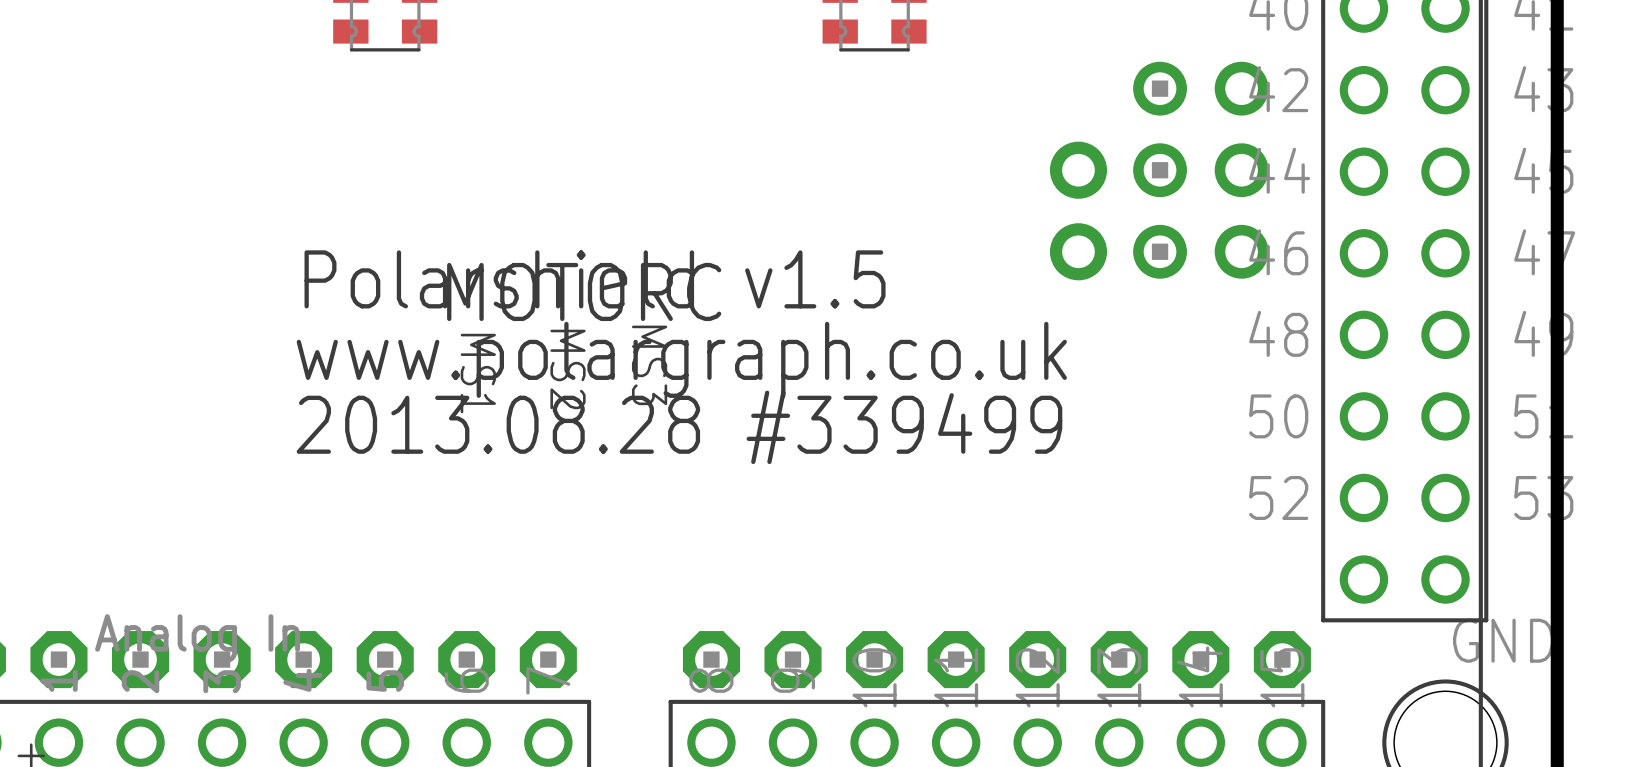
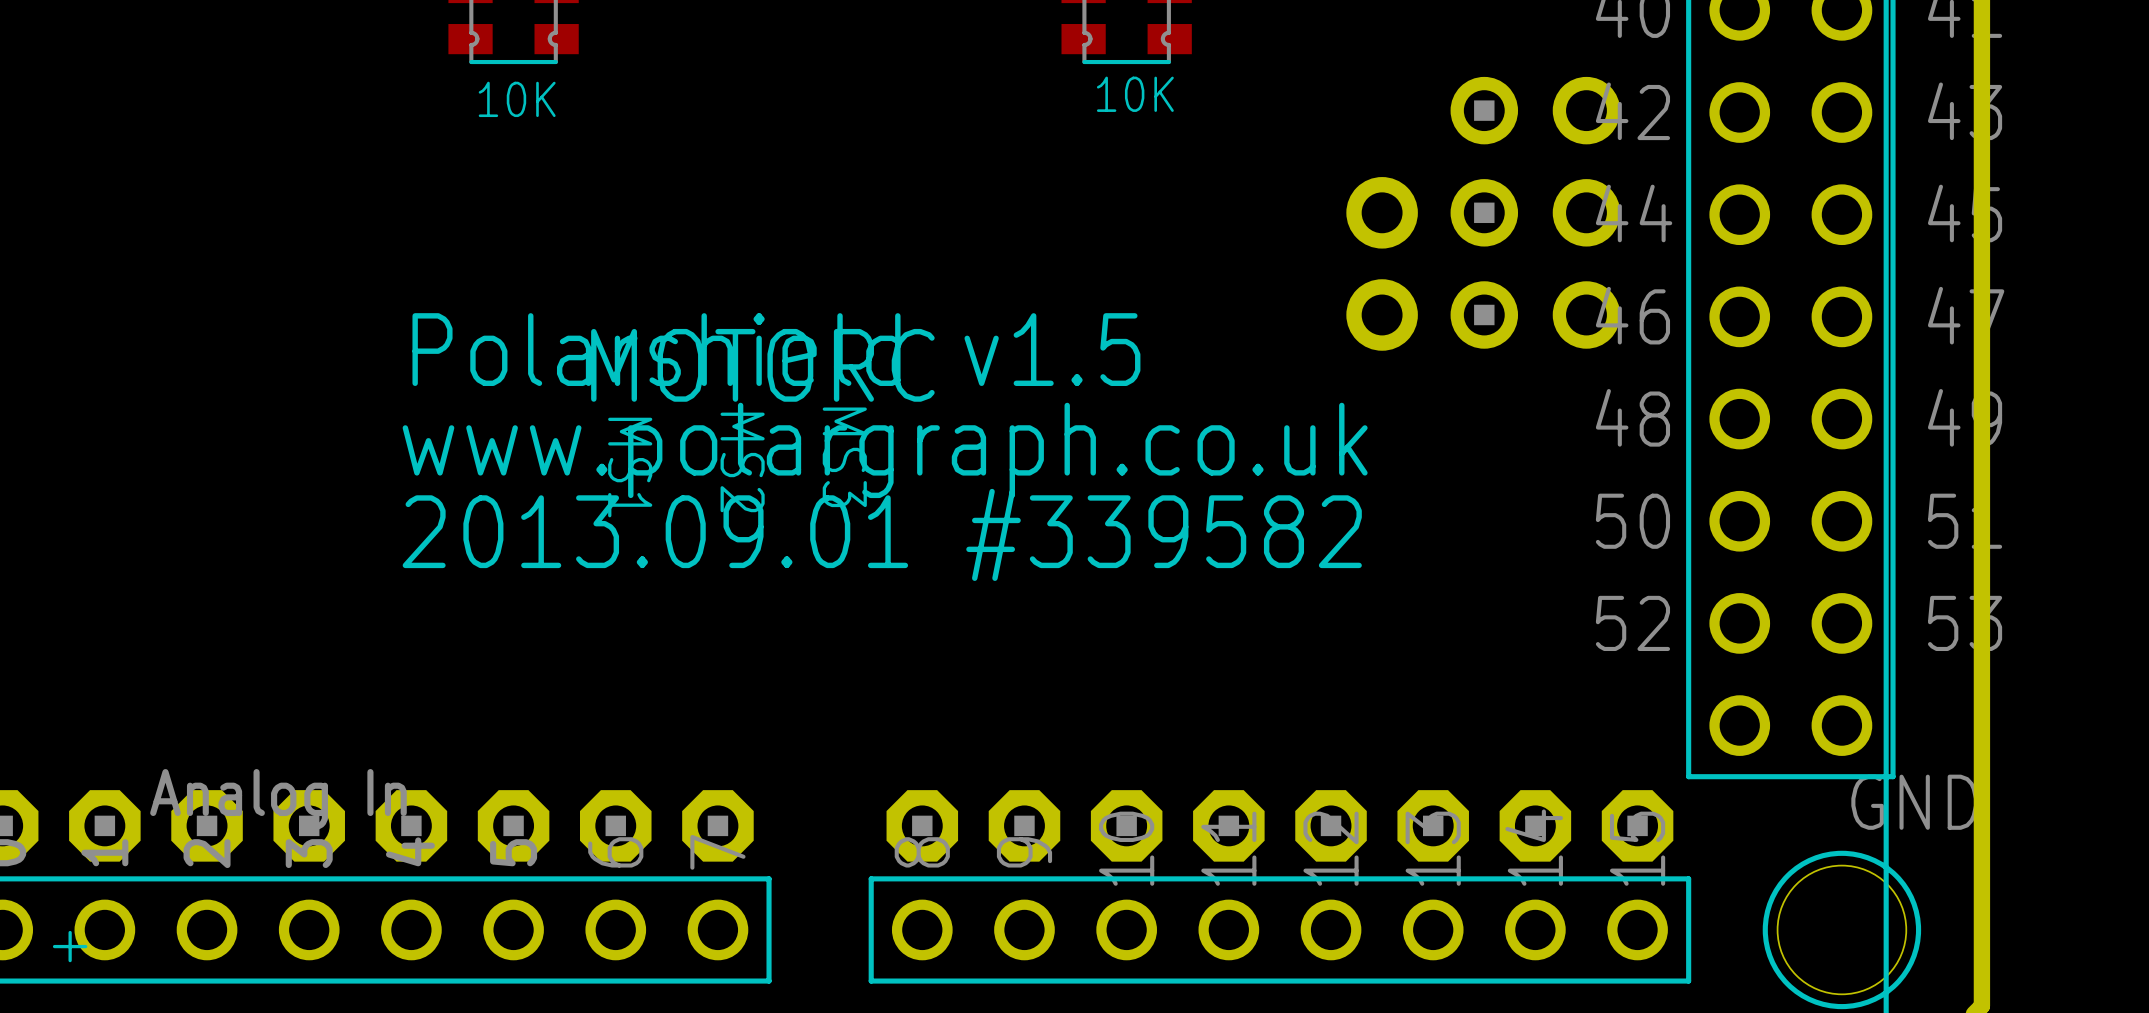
text: none -> 10K (1135, 94)
text: none -> 10K (517, 99)
text: 2013.08.28 #339499 (679, 427) -> 2013.09.01 #339582 (882, 534)

